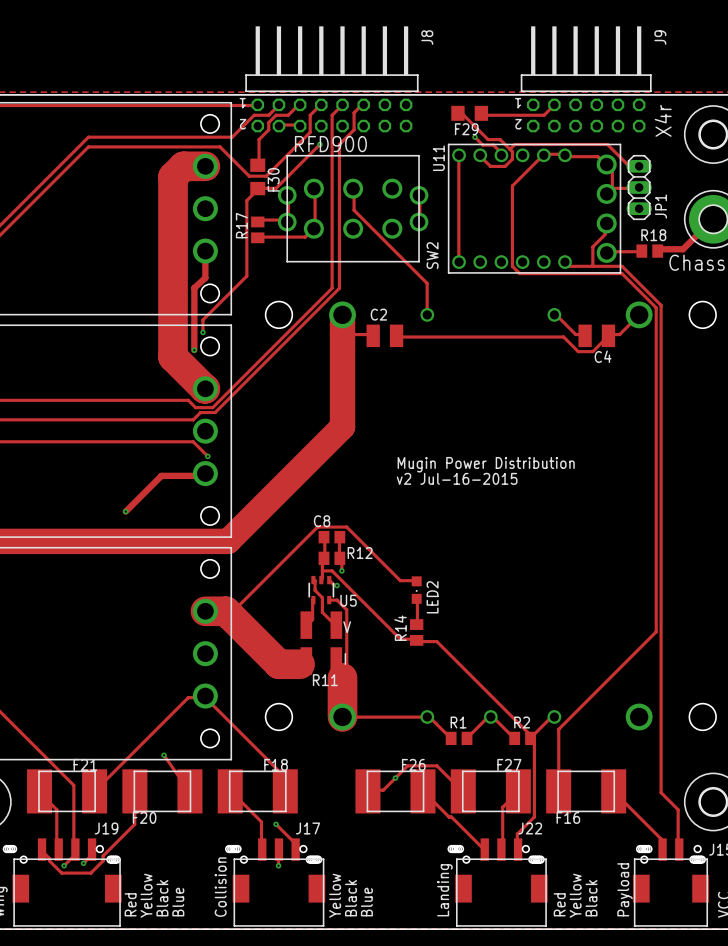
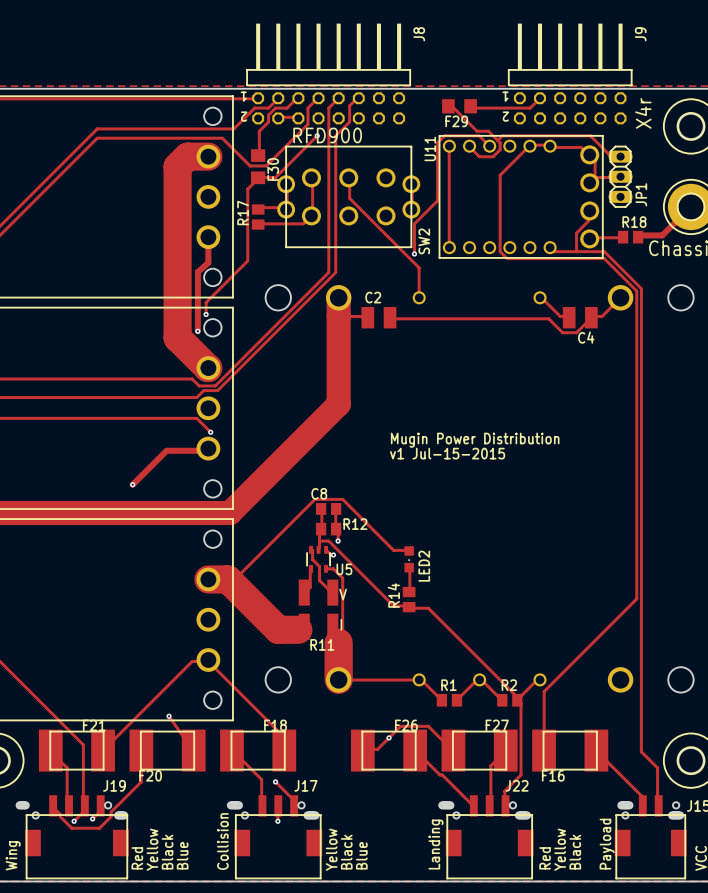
track: (474, 137) (482, 145) (493, 145) (501, 155) -> (414, 253) (414, 223) (437, 200) (437, 142) (444, 135) (479, 135) (489, 146)
via: (474, 137) -> none
via: none -> (414, 253)
text: v2 Jul-16-2015 (457, 478) -> v1 Jul-15-2015 (447, 453)

